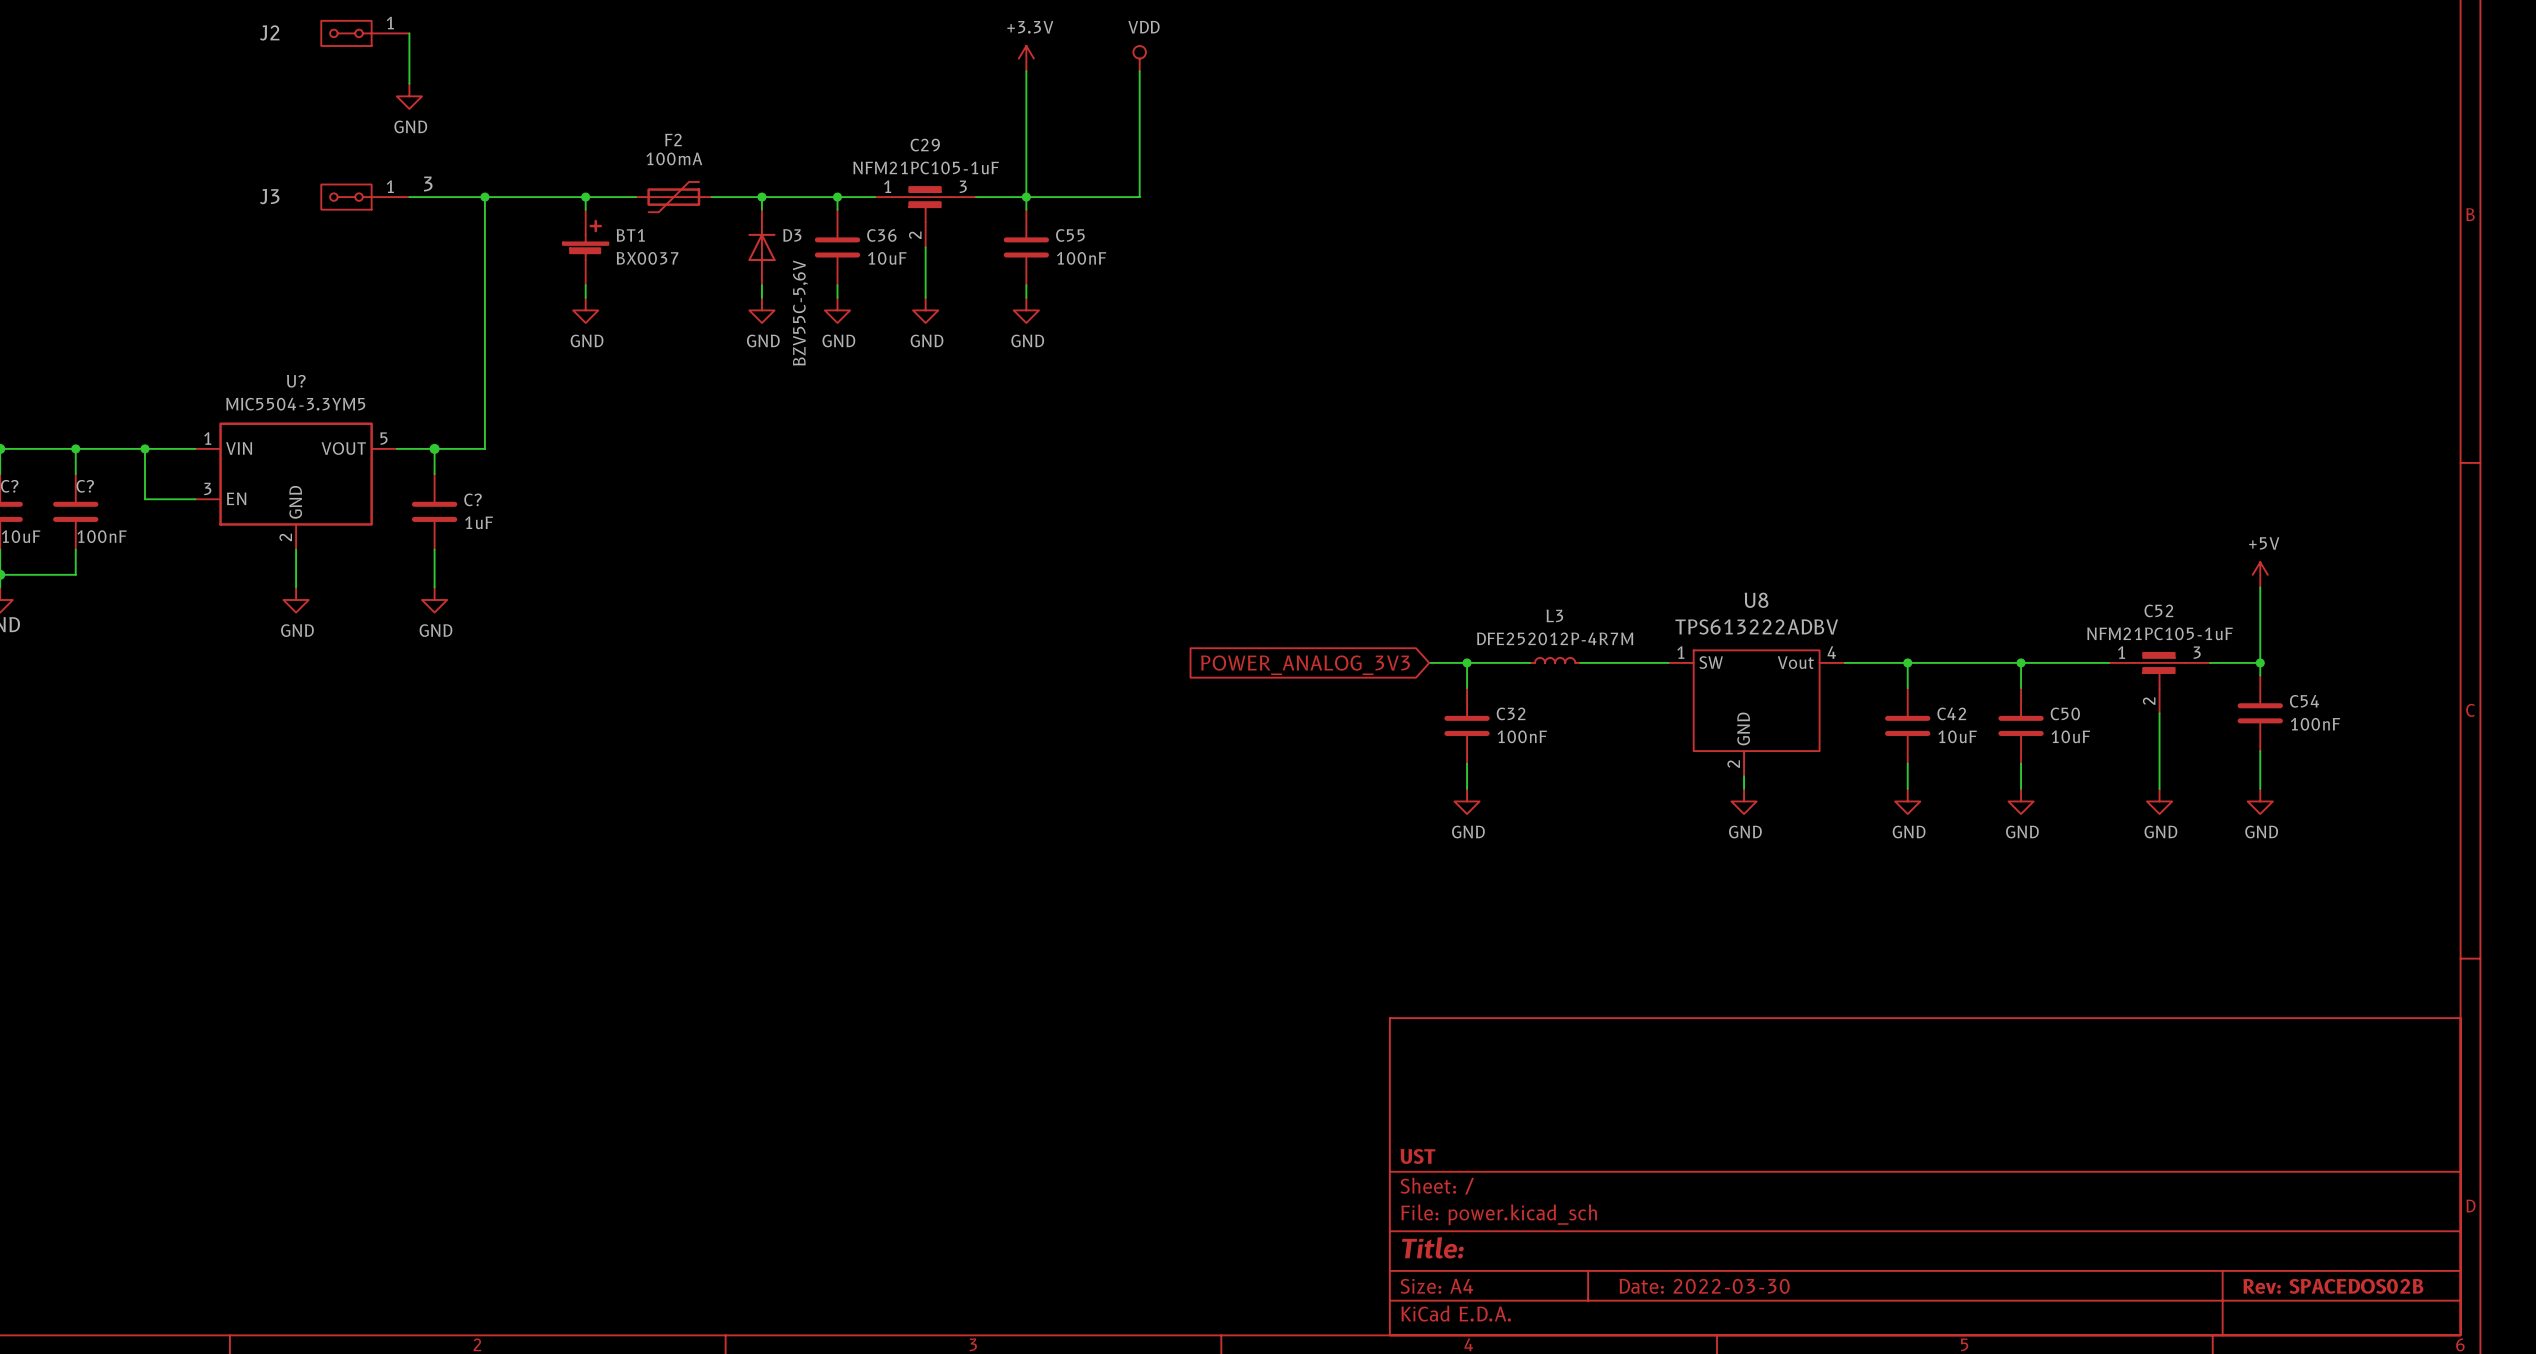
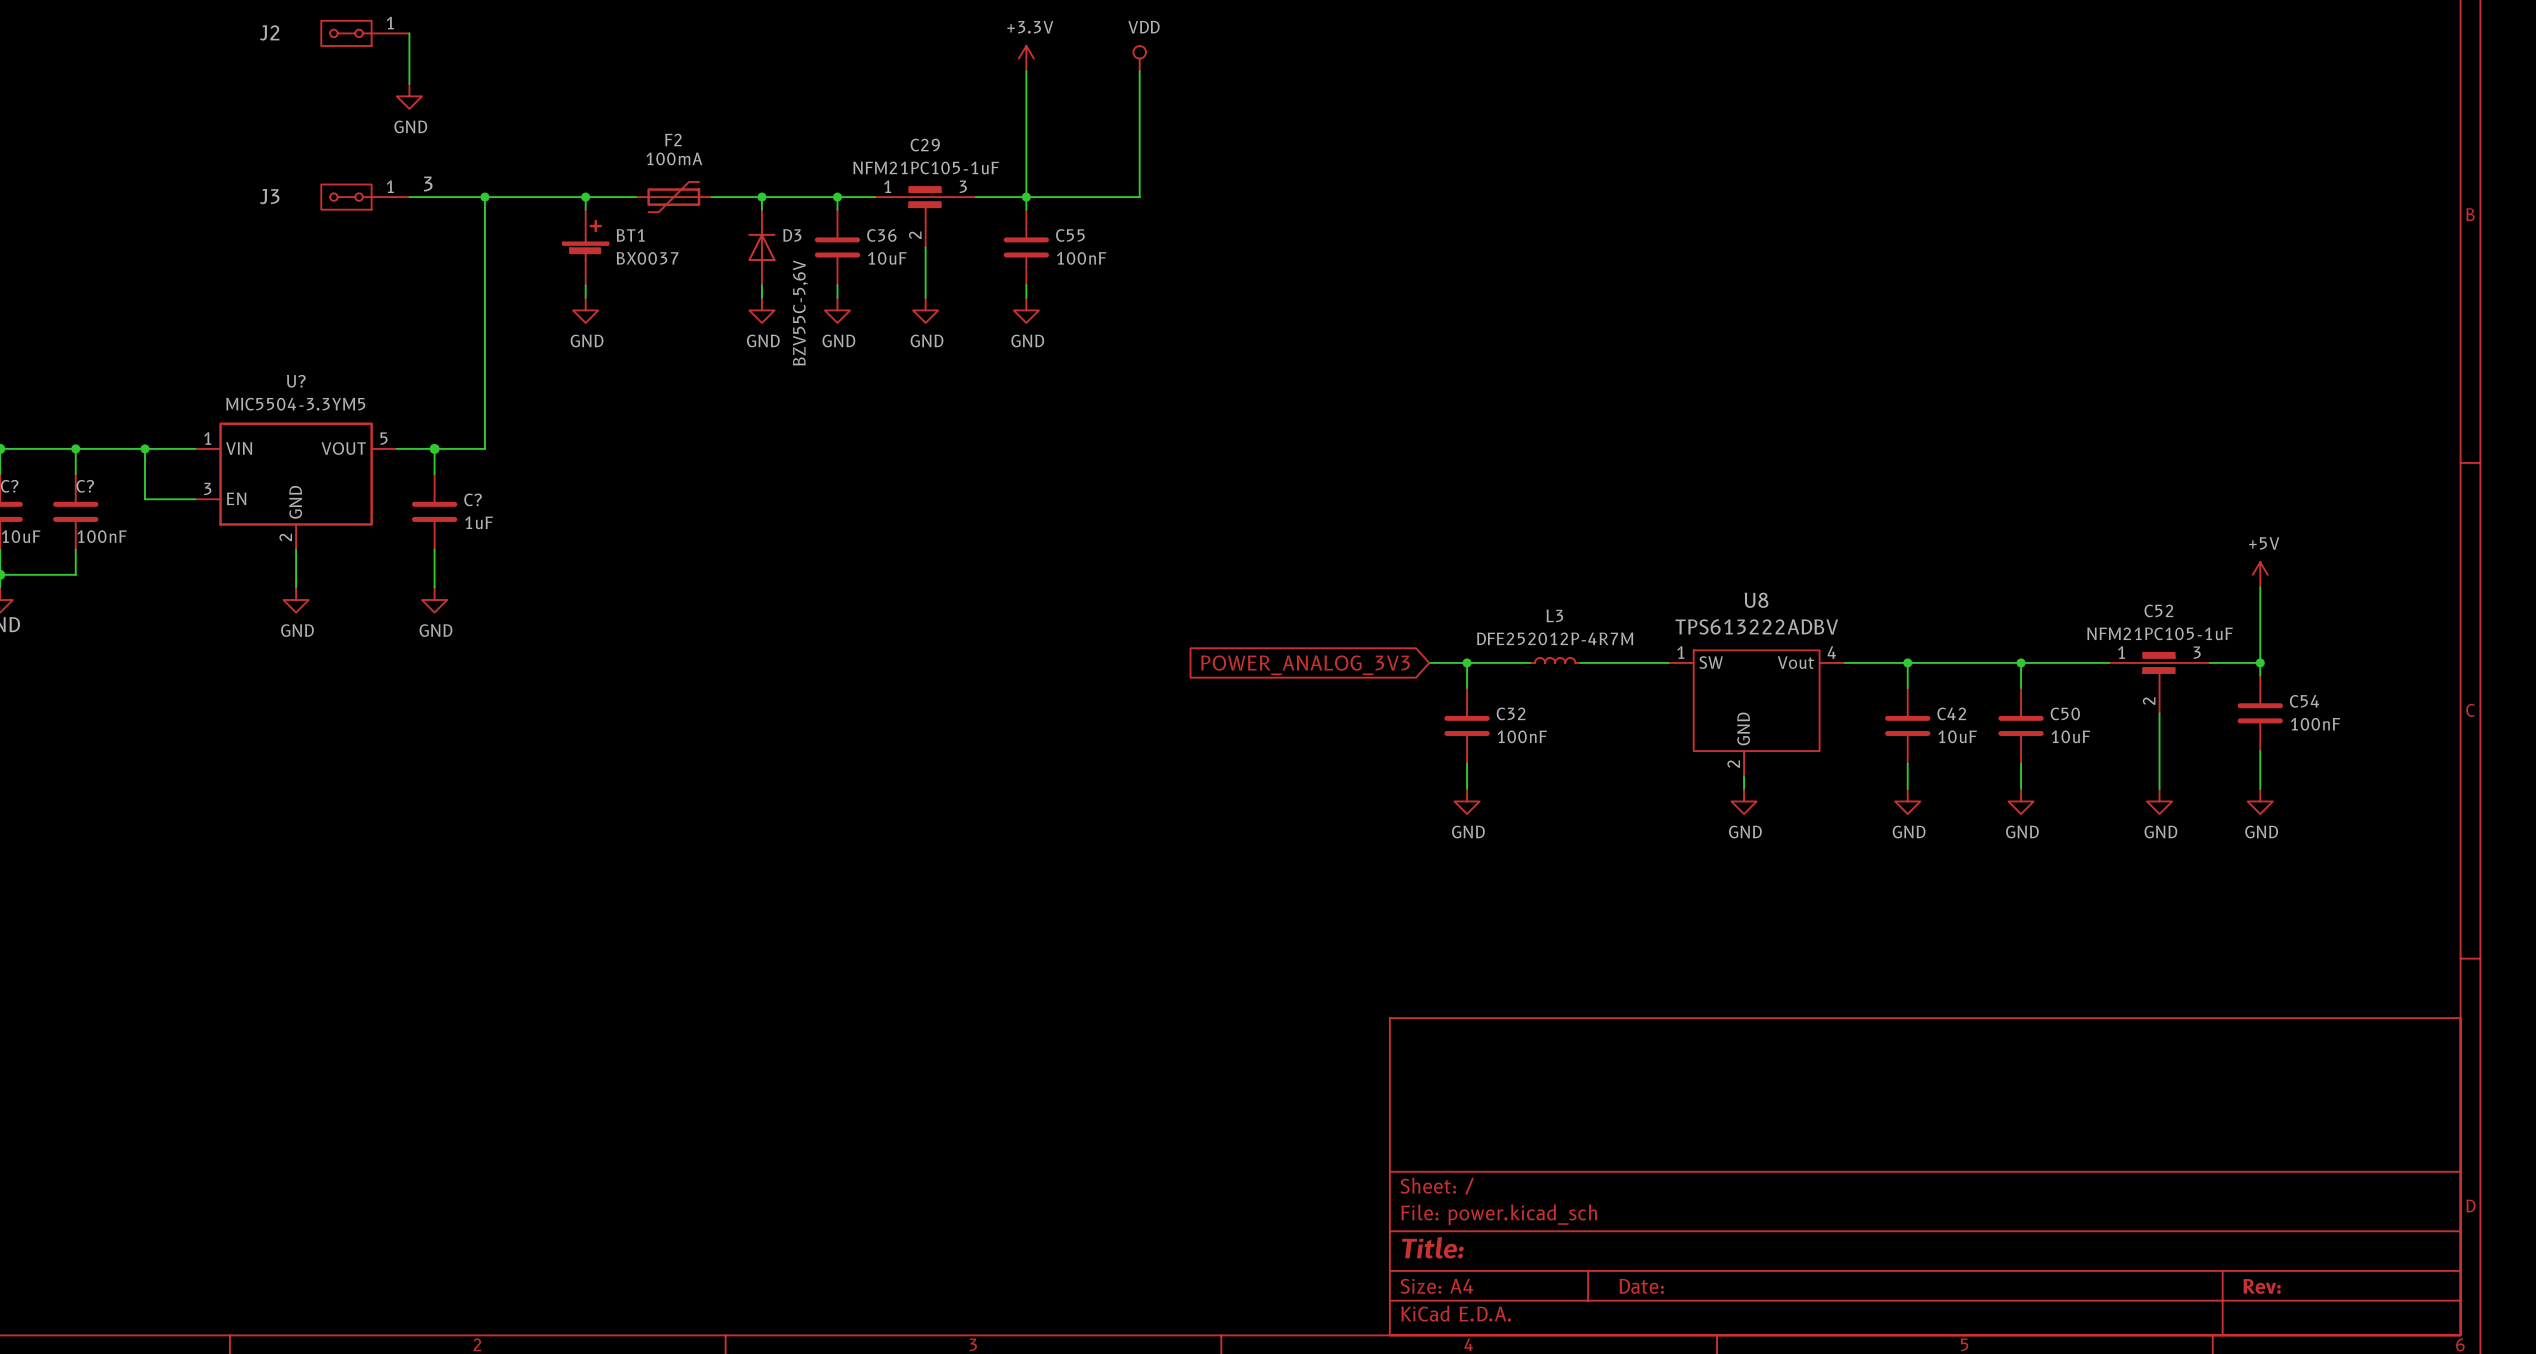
title block: UST (1417, 1156) -> none
title block: Date: 2022-03-30 (1704, 1286) -> Date: (1641, 1286)
title block: Rev: SPACEDOS02B (2333, 1286) -> Rev: (2262, 1286)

